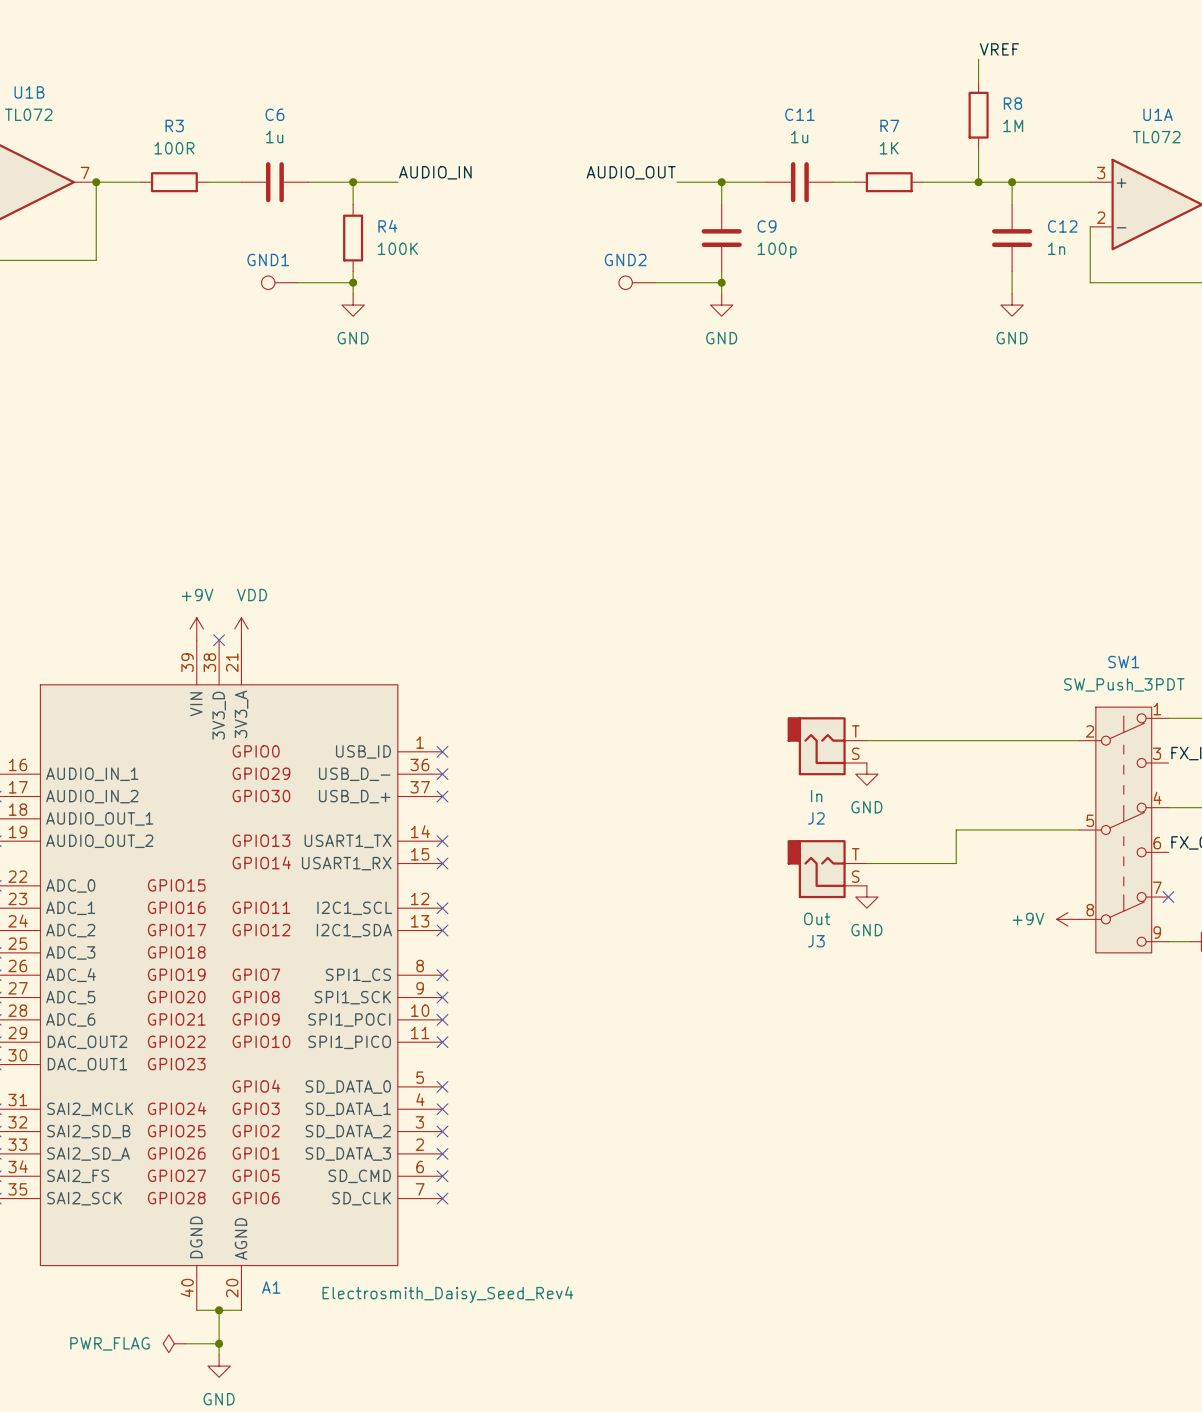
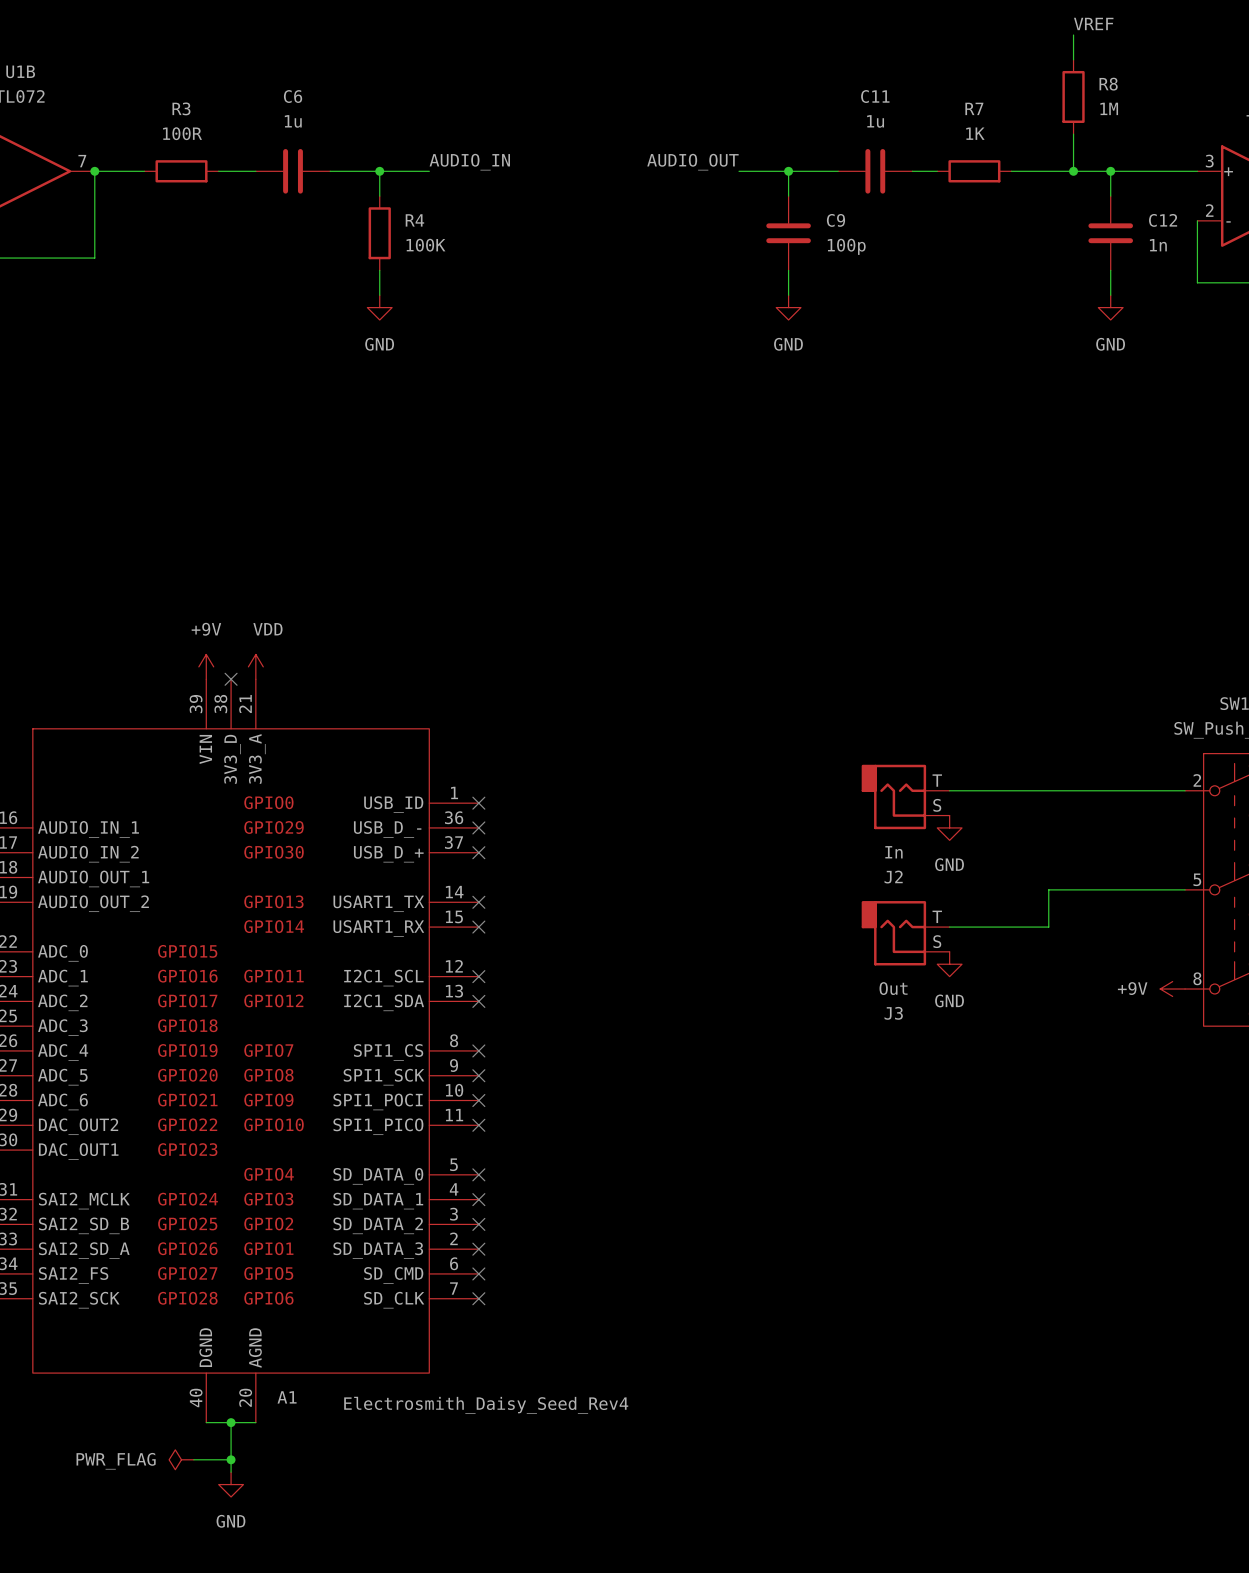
GND1: (279, 282) -> none
wire: (297, 282) (353, 282) -> none
junction: (353, 282) -> none
GND2: (636, 282) -> none
wire: (654, 282) (721, 282) -> none
junction: (721, 282) -> none

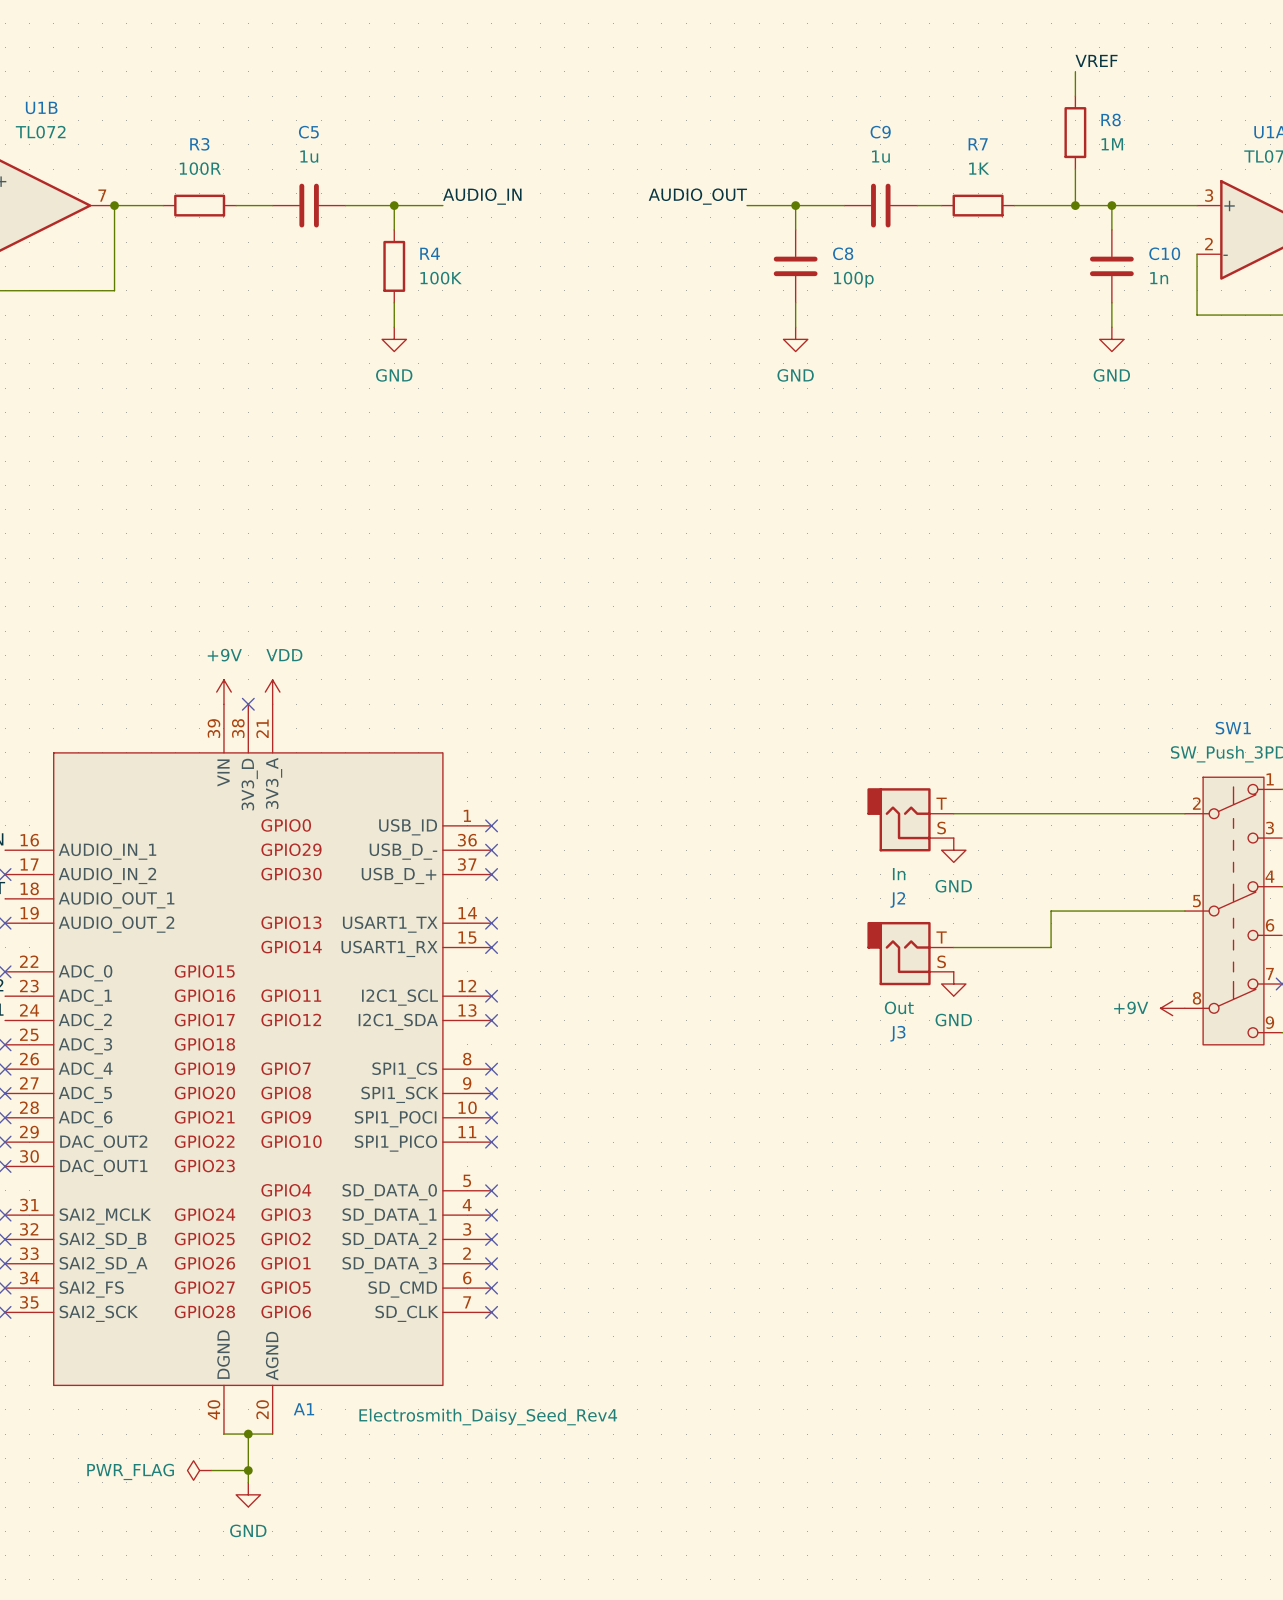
C6 name: C6 (293, 96) -> C5 (308, 132)
C11 name: C11 (875, 96) -> C9 (880, 132)
C9 name: C9 (835, 220) -> C8 (843, 253)
C12 name: C12 (1163, 220) -> C10 (1164, 253)

